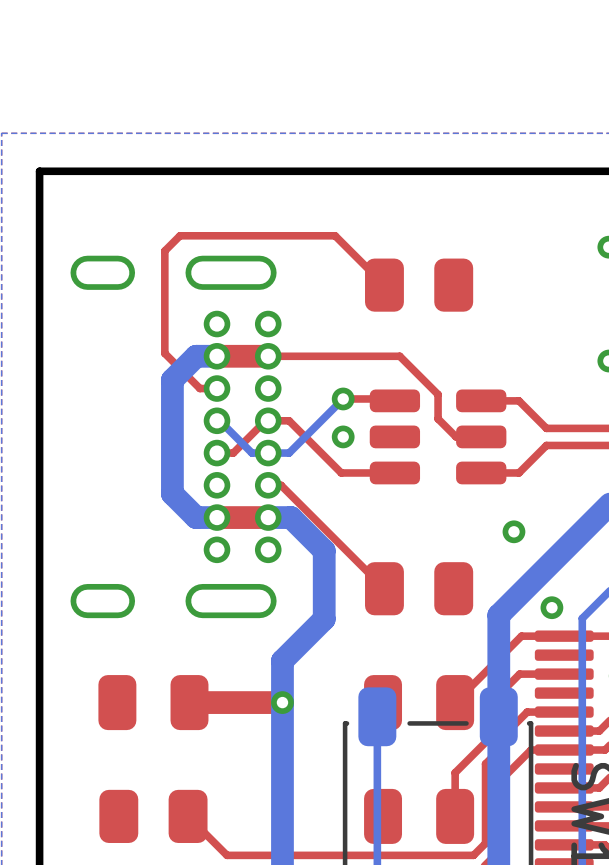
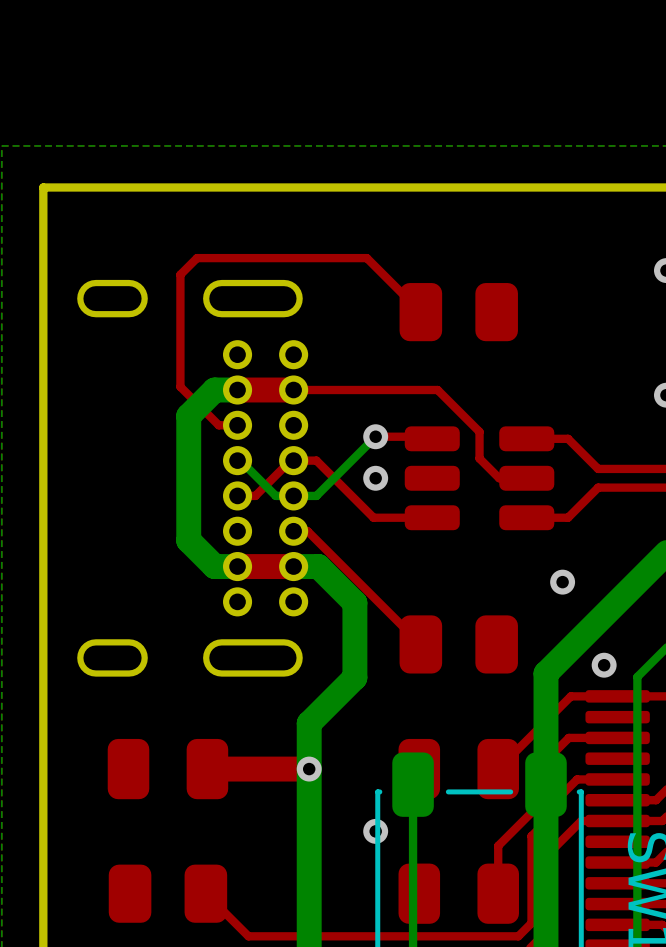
via: none -> (375, 831)

